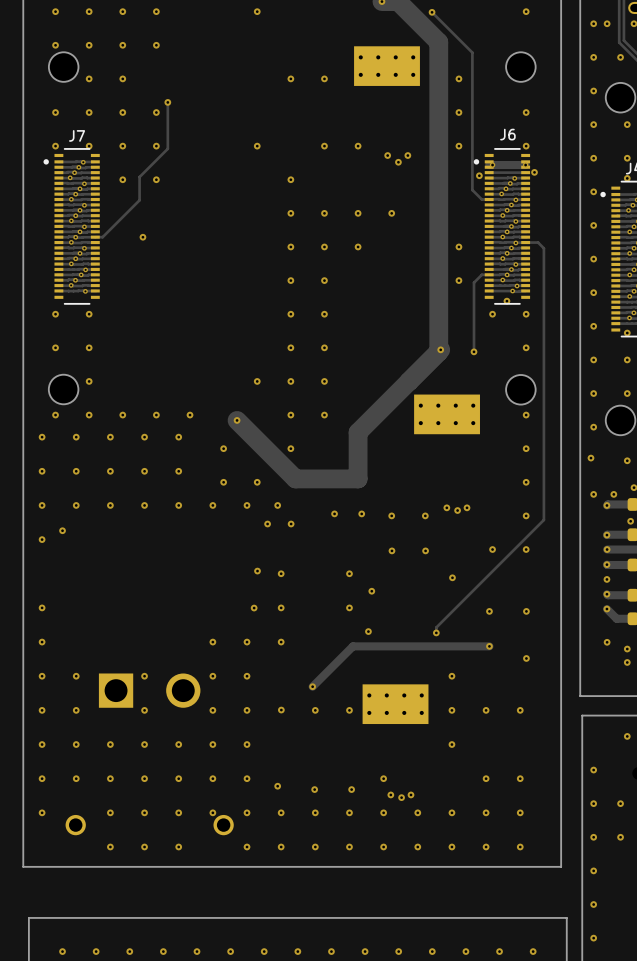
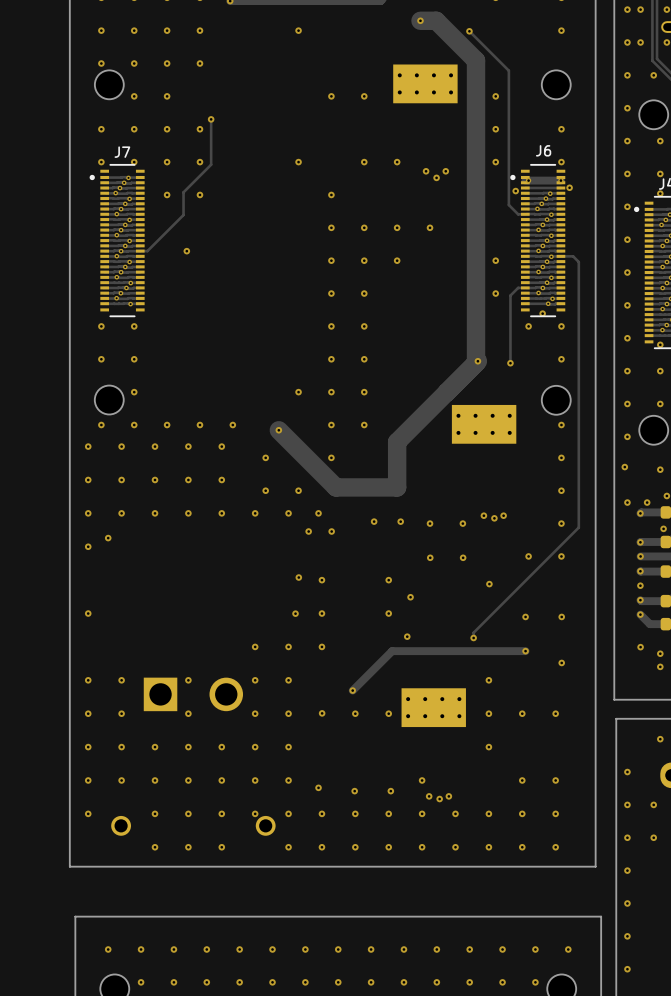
via: (42, 642) -> none

